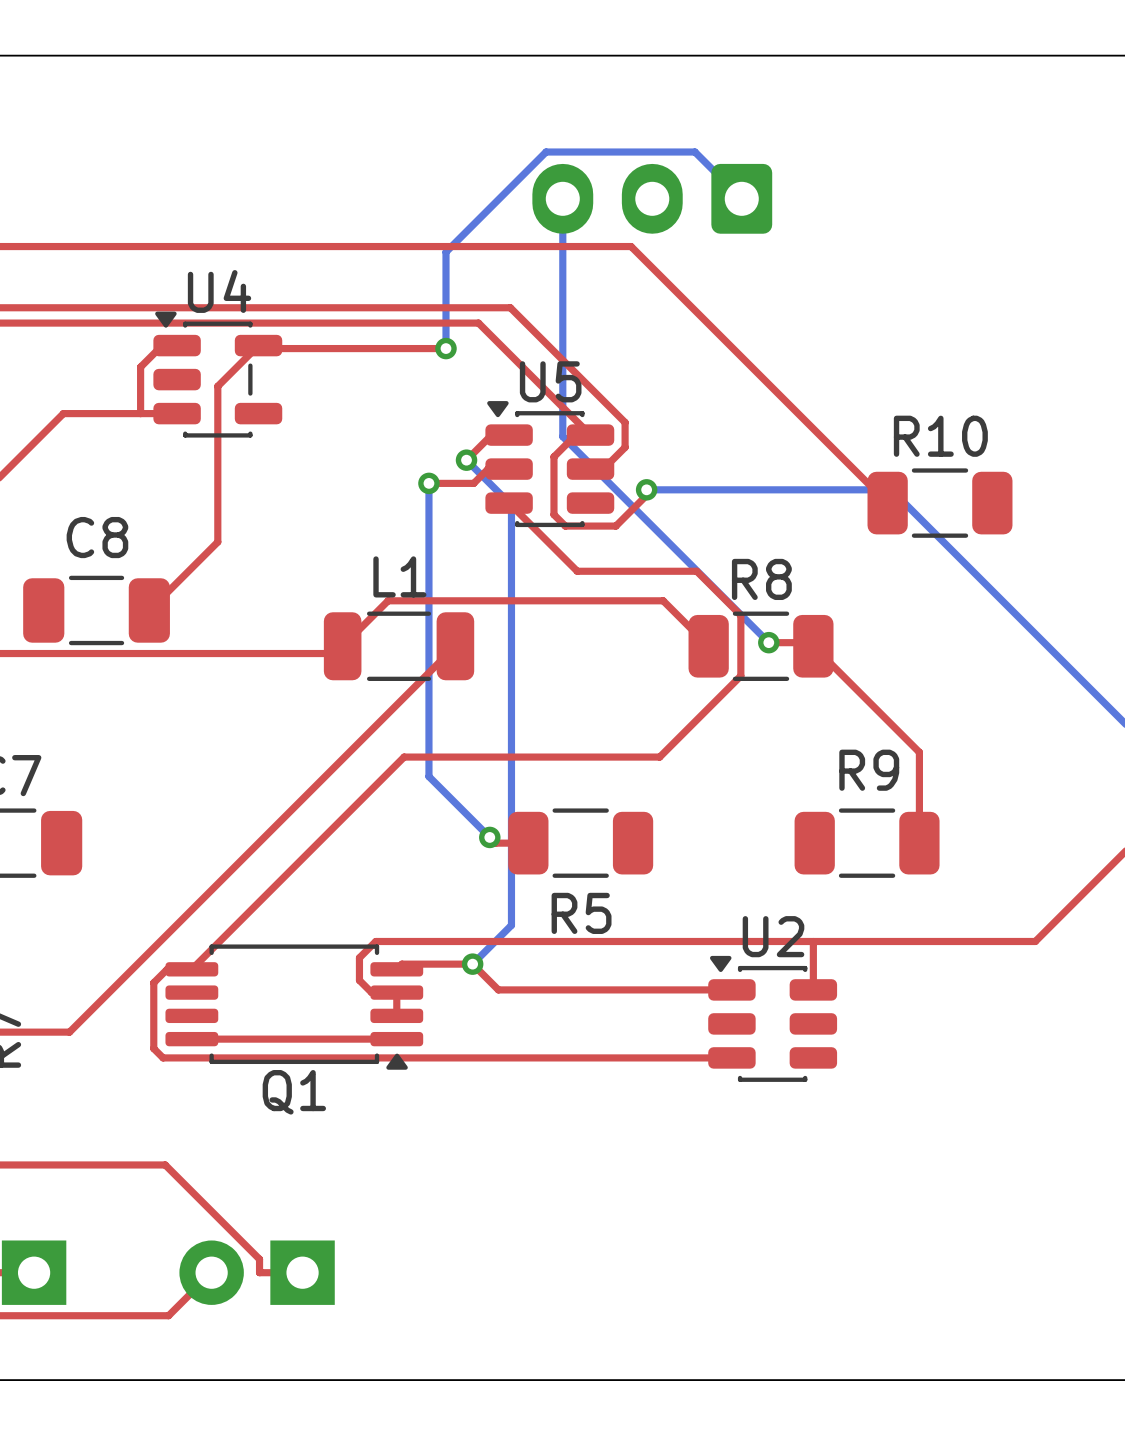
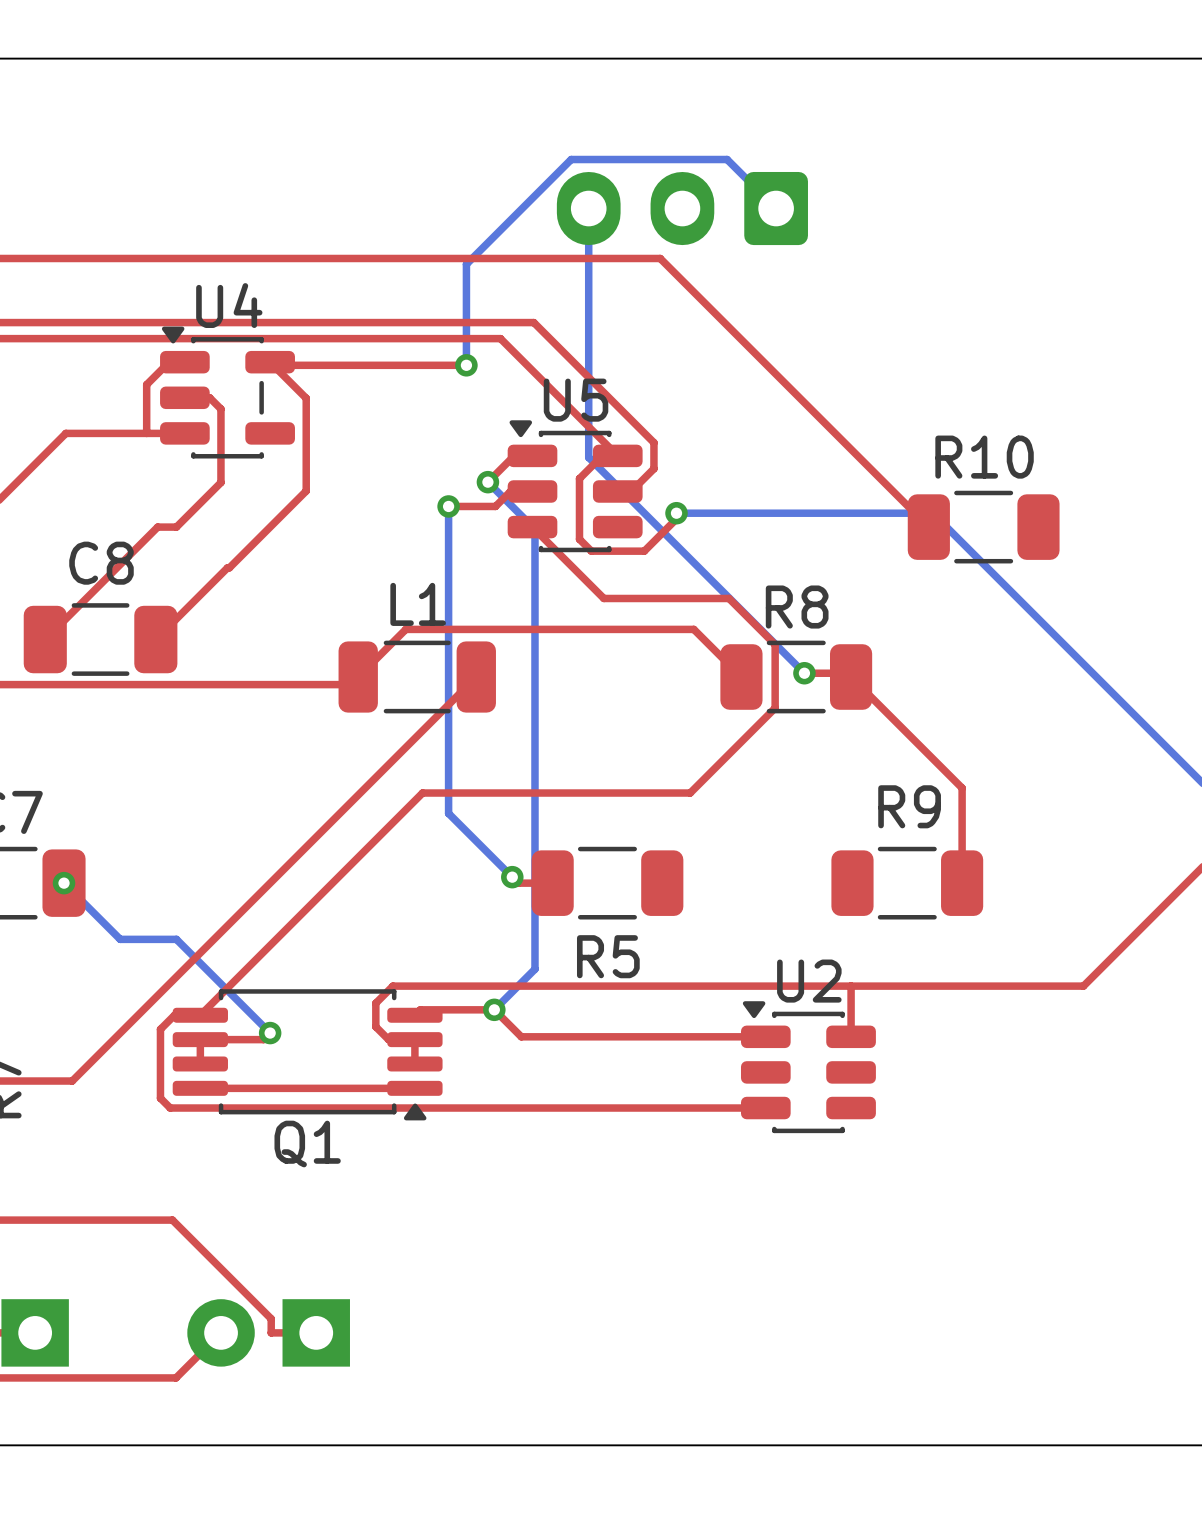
top track: (258, 345) (217, 386) (217, 542) -> (273, 365) (306, 398) (306, 491) (227, 567)
top track: none -> (184, 397) (209, 397) (220, 409) (220, 482) (176, 527) (157, 527) (45, 639)
bottom track: none -> (64, 883) (120, 939) (176, 939) (270, 1033)
via: none -> (64, 883)
top track: none -> (270, 1033) (263, 1039) (200, 1039) (200, 1063)
via: none -> (270, 1033)

